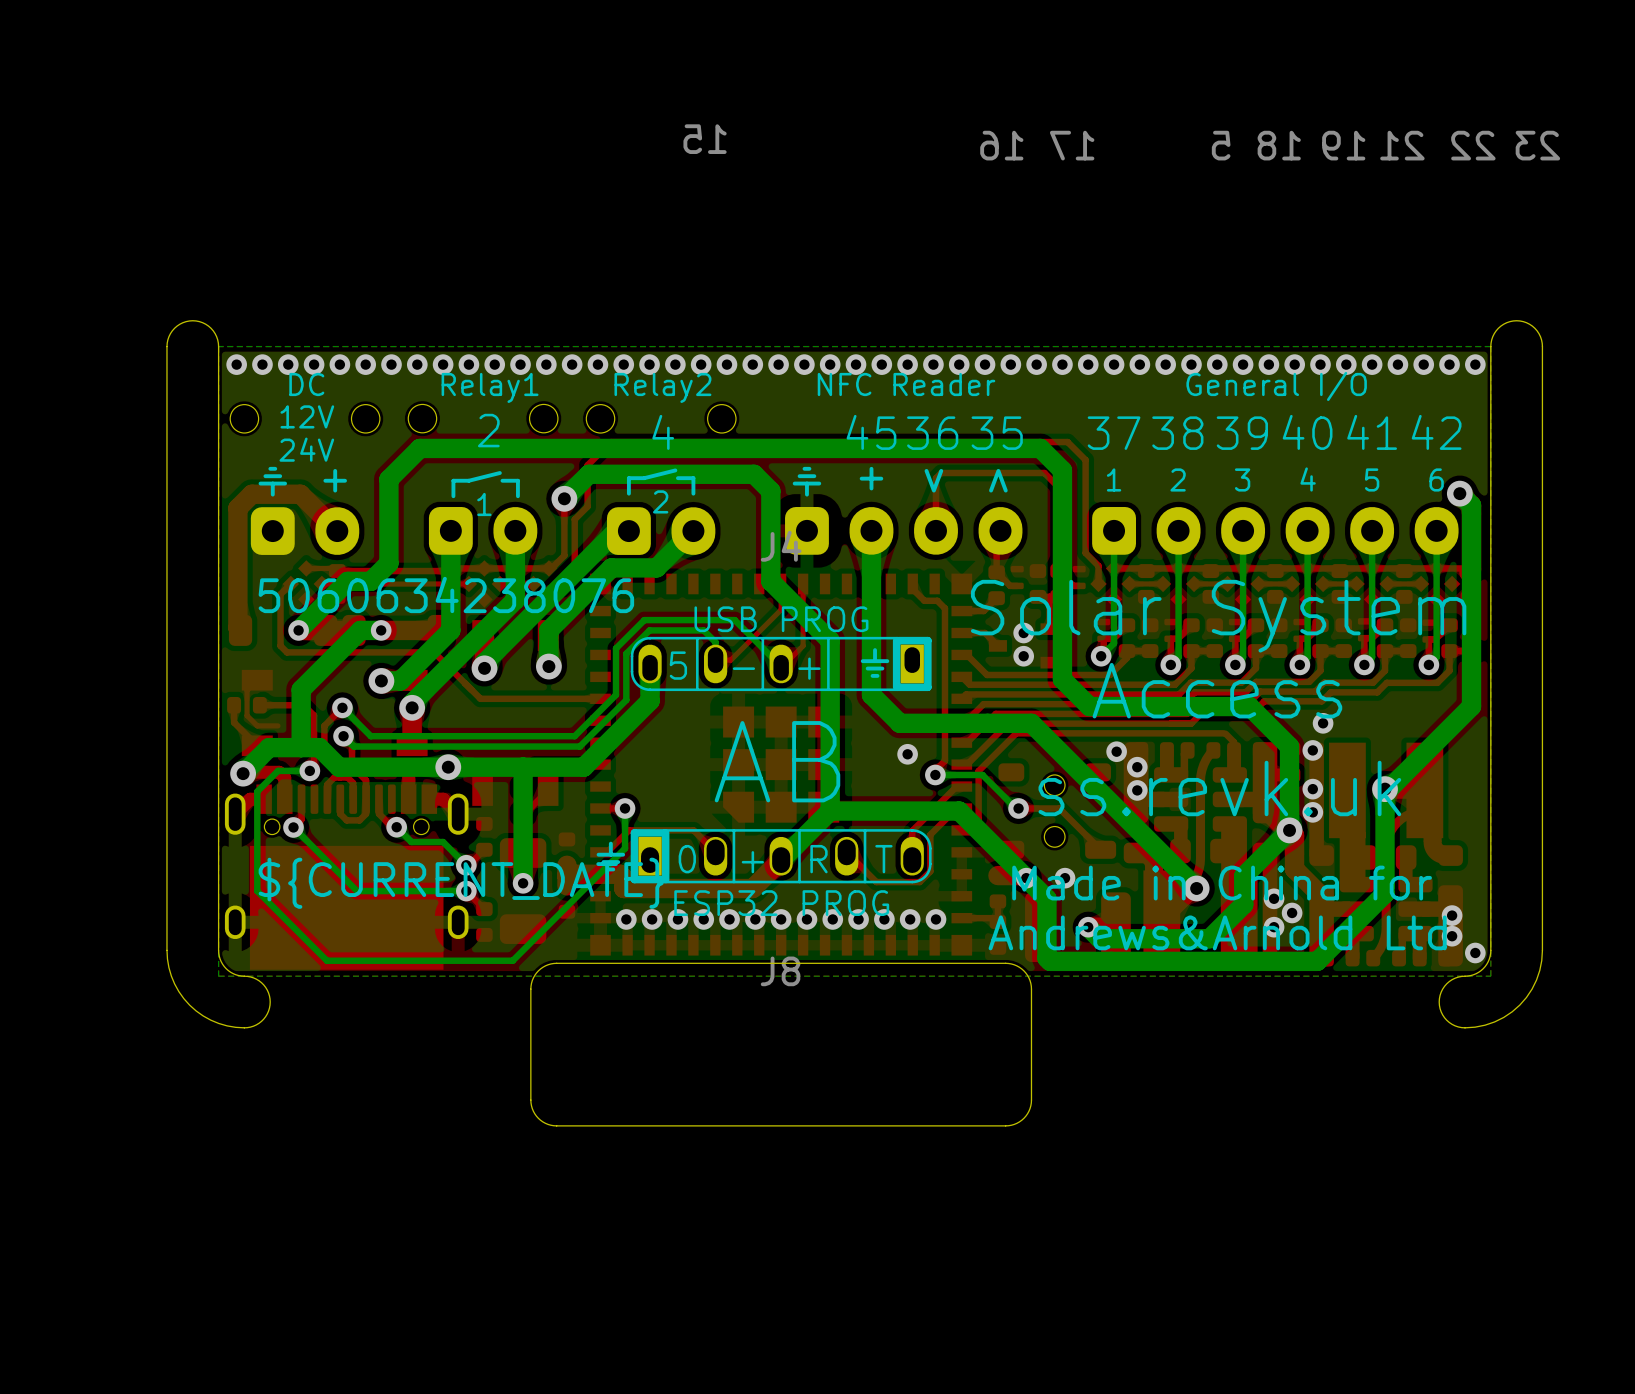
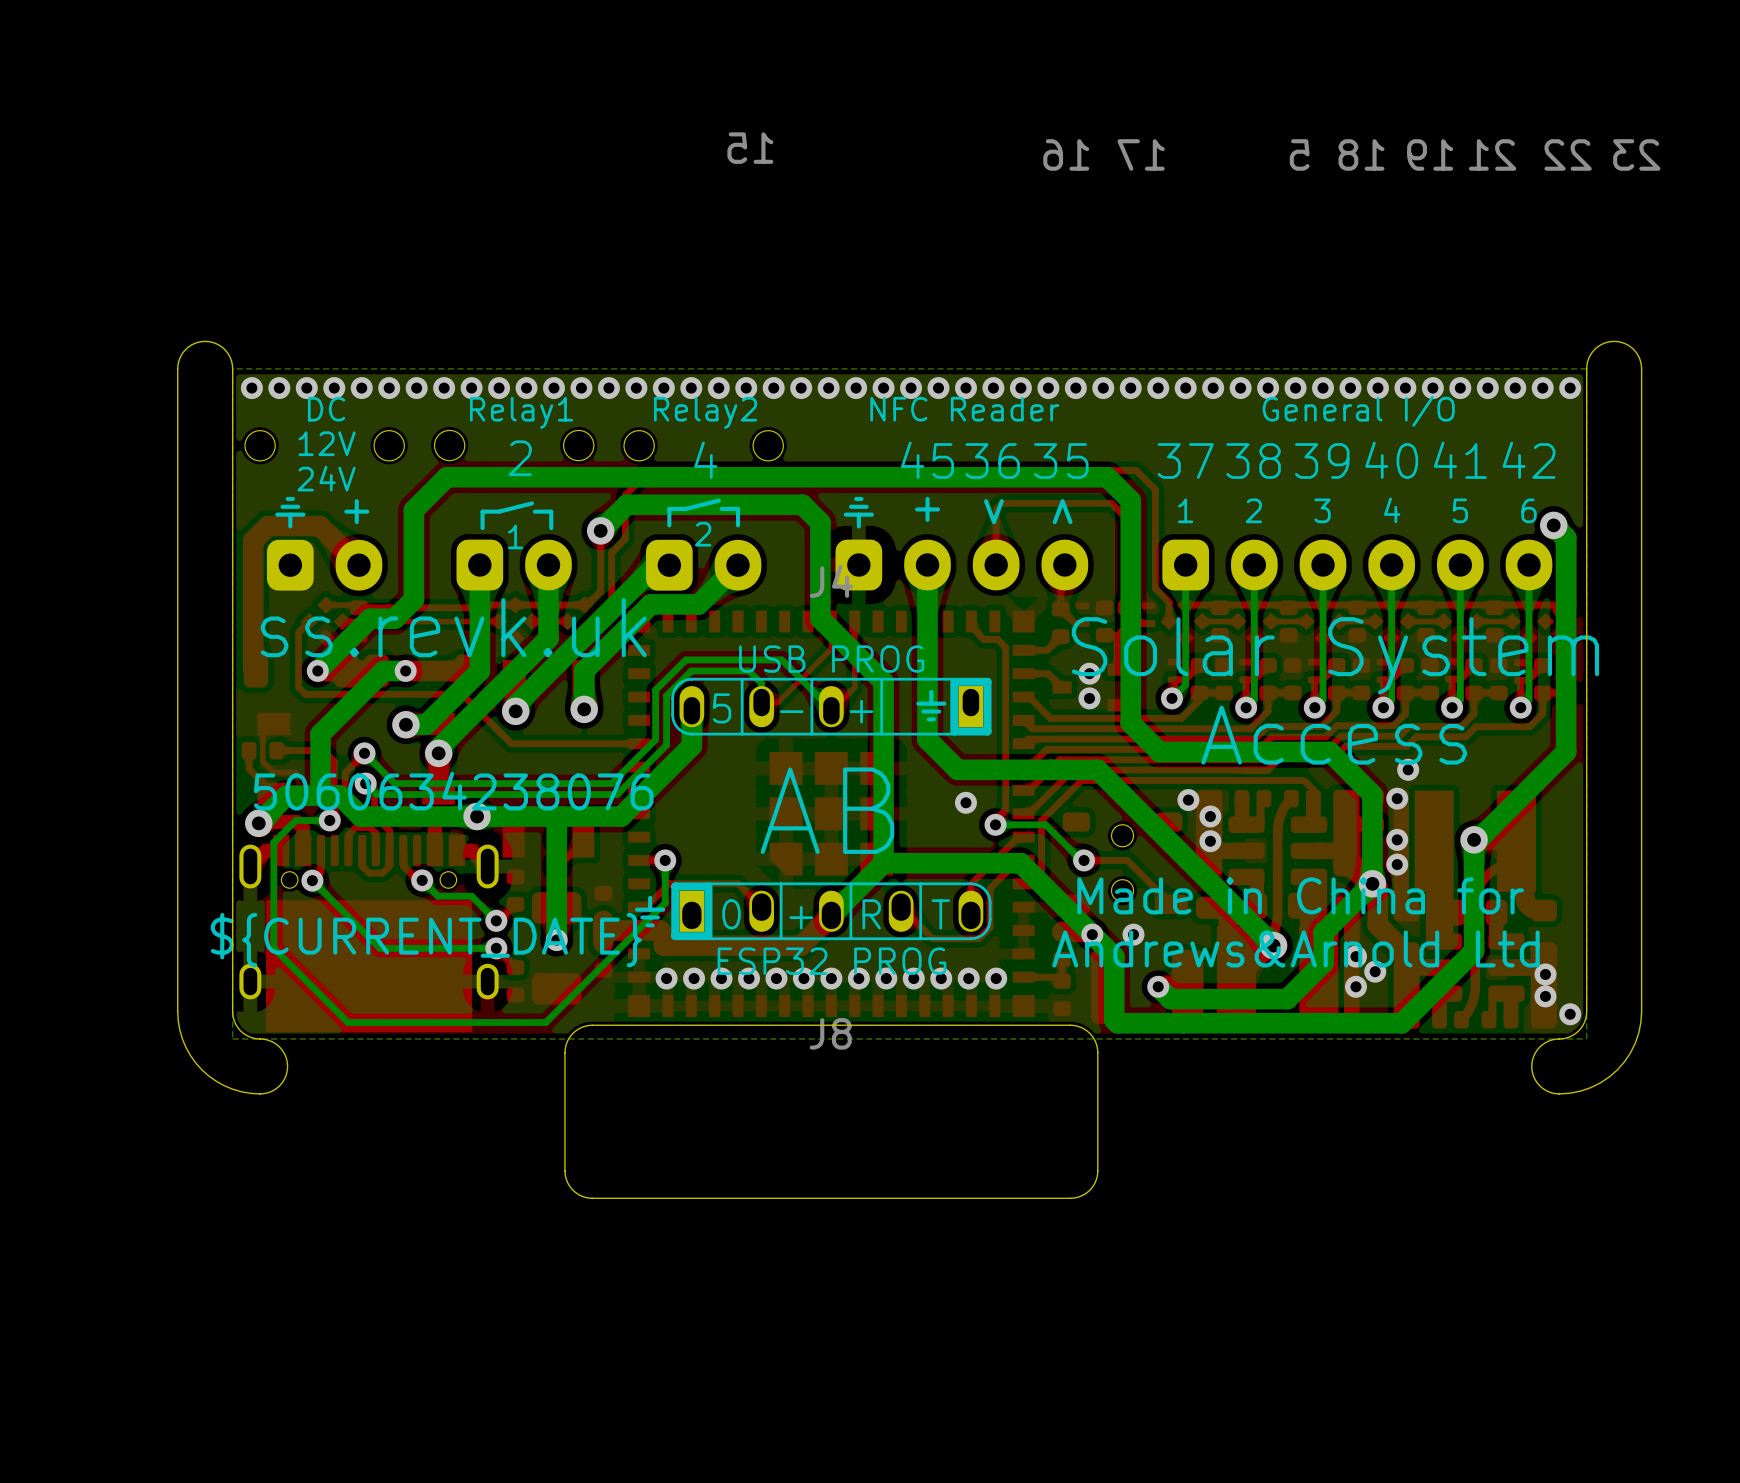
text: none -> ss.revk.uk (453, 627)
text position: 5060634238076 (446, 594) -> 5060634238076 (453, 791)
text position: Solar System (1218, 616) -> Solar System (1335, 655)
text position: Access (1217, 690) -> Access (1334, 735)
text: ss.revk.uk (1219, 788) -> none
text position: ${CURRENT_DATE} (461, 883) -> ${CURRENT_DATE} (426, 940)
text position: Made in China for (1222, 883) -> Made in China for (1300, 895)
text position: Andrews&Arnold Ltd (1217, 932) -> Andrews&Arnold Ltd (1295, 948)

